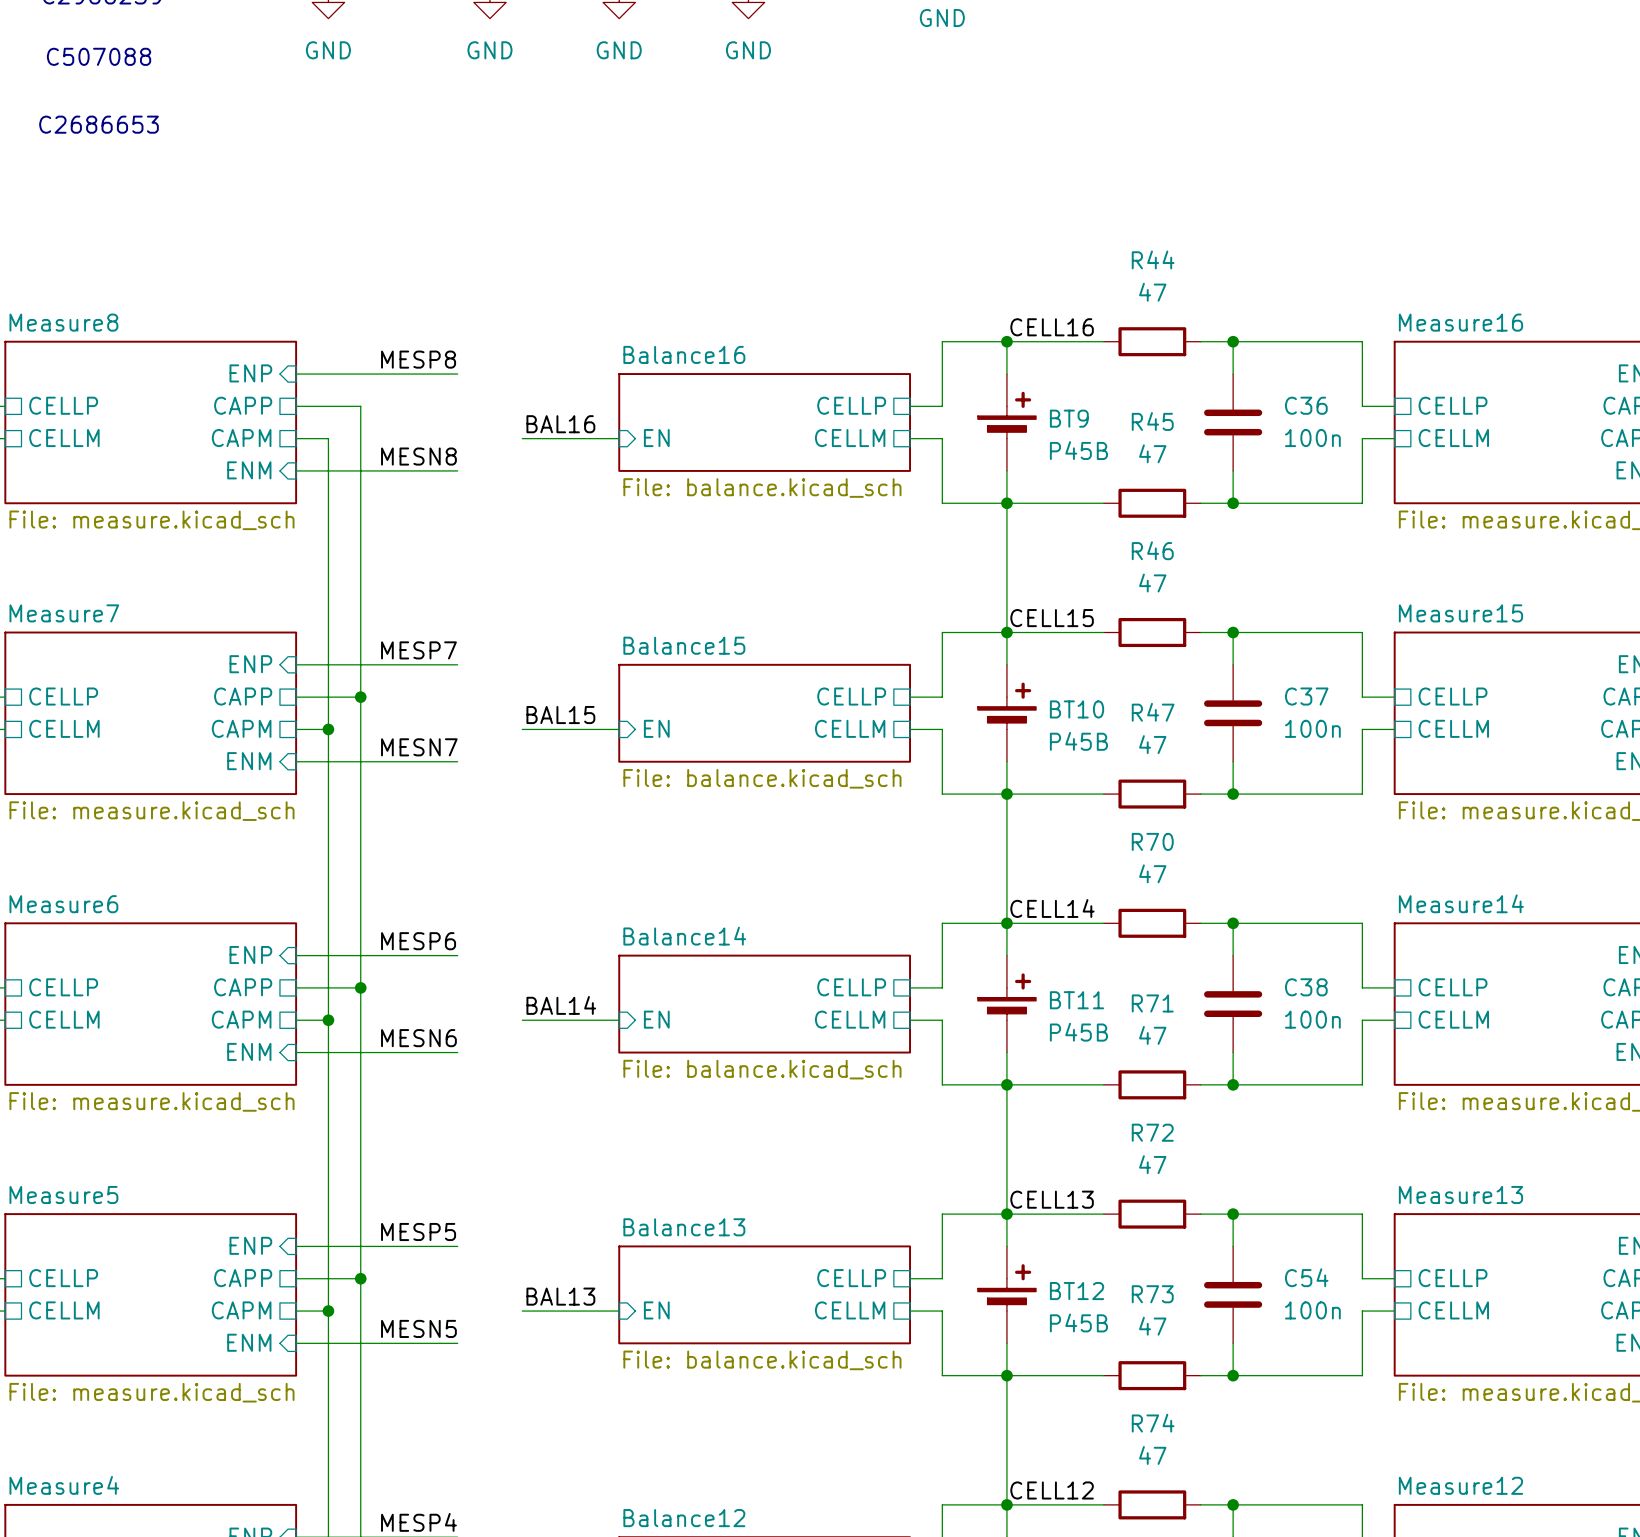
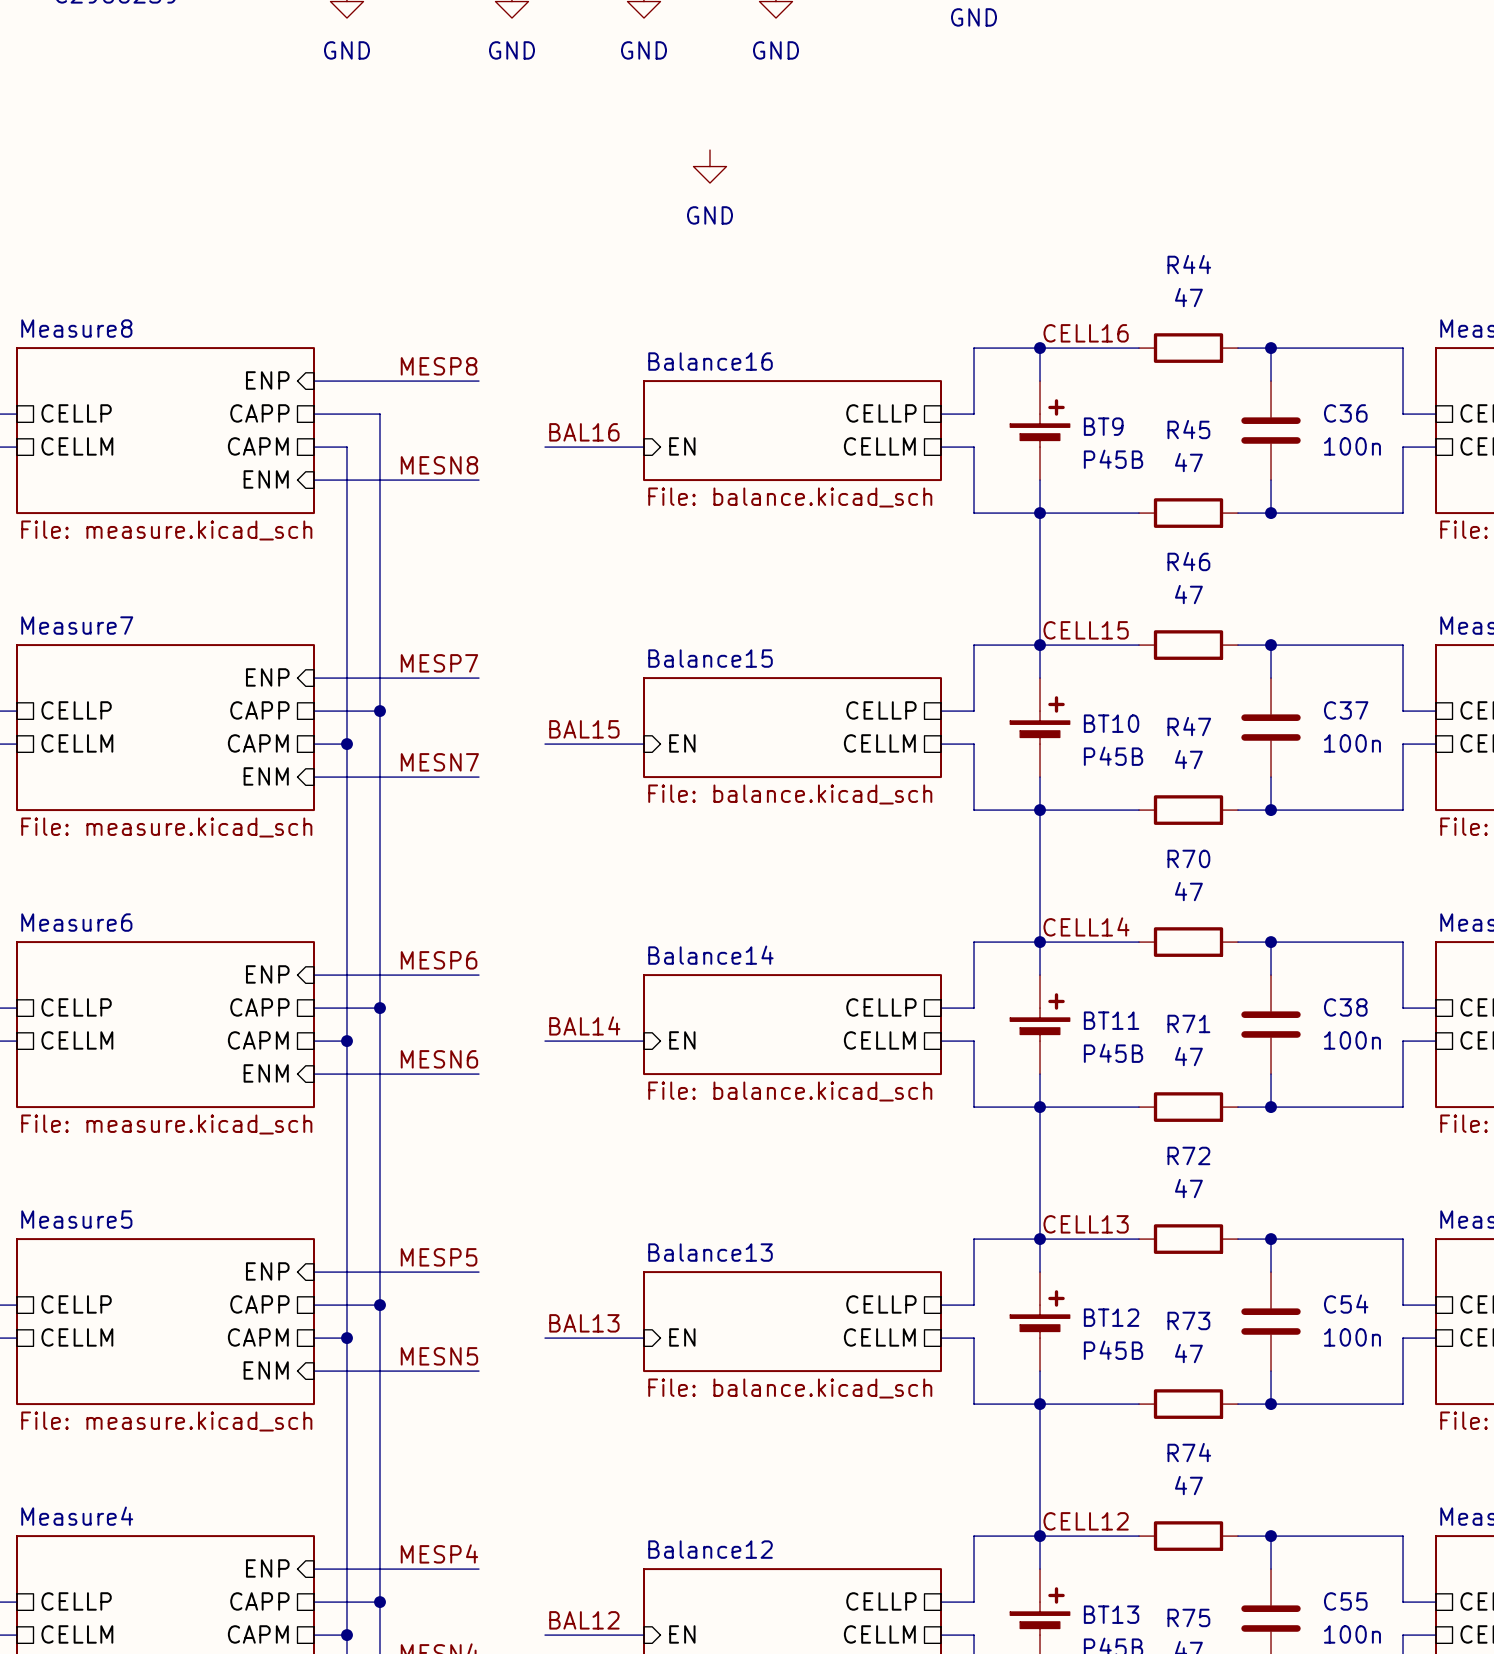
text: C507088 (99, 56) -> none
text: C2686653 (99, 124) -> none
power symbol: none -> GND (710, 166)

